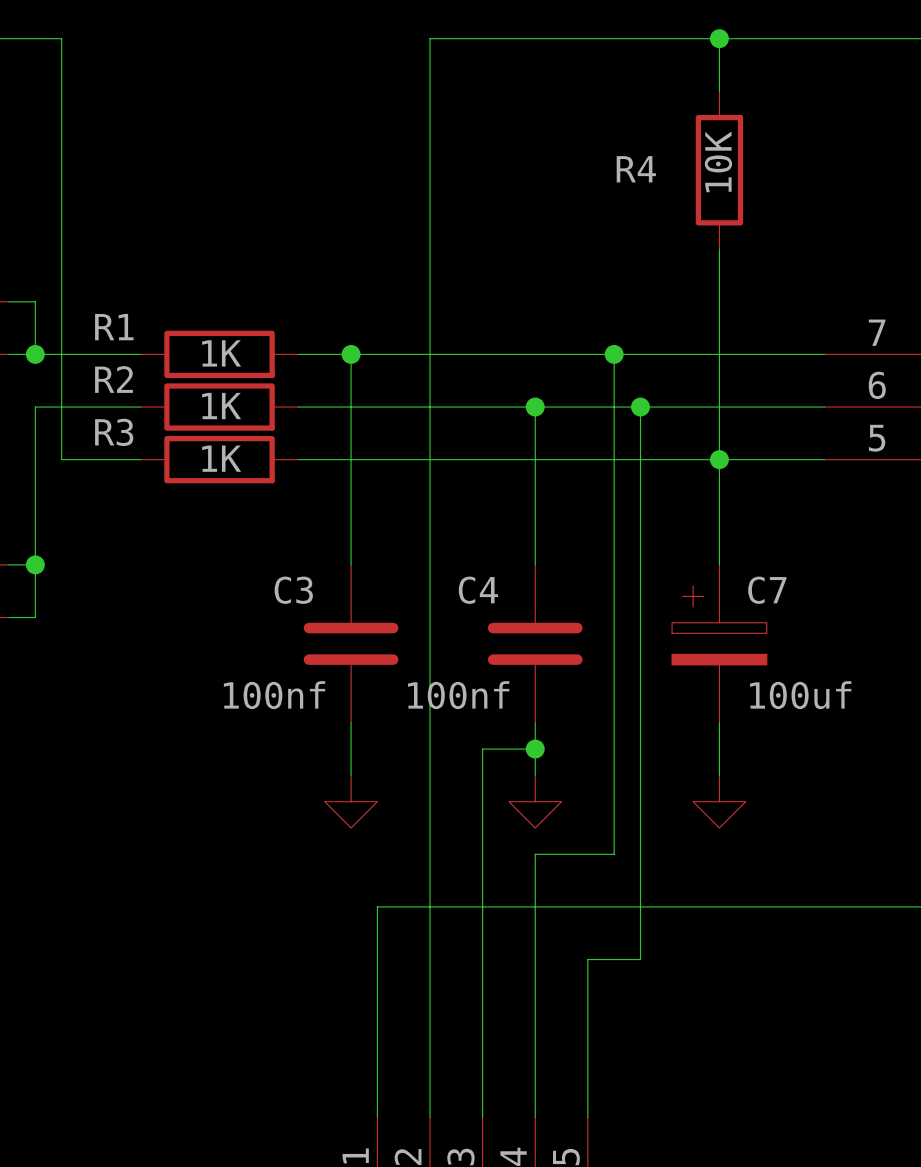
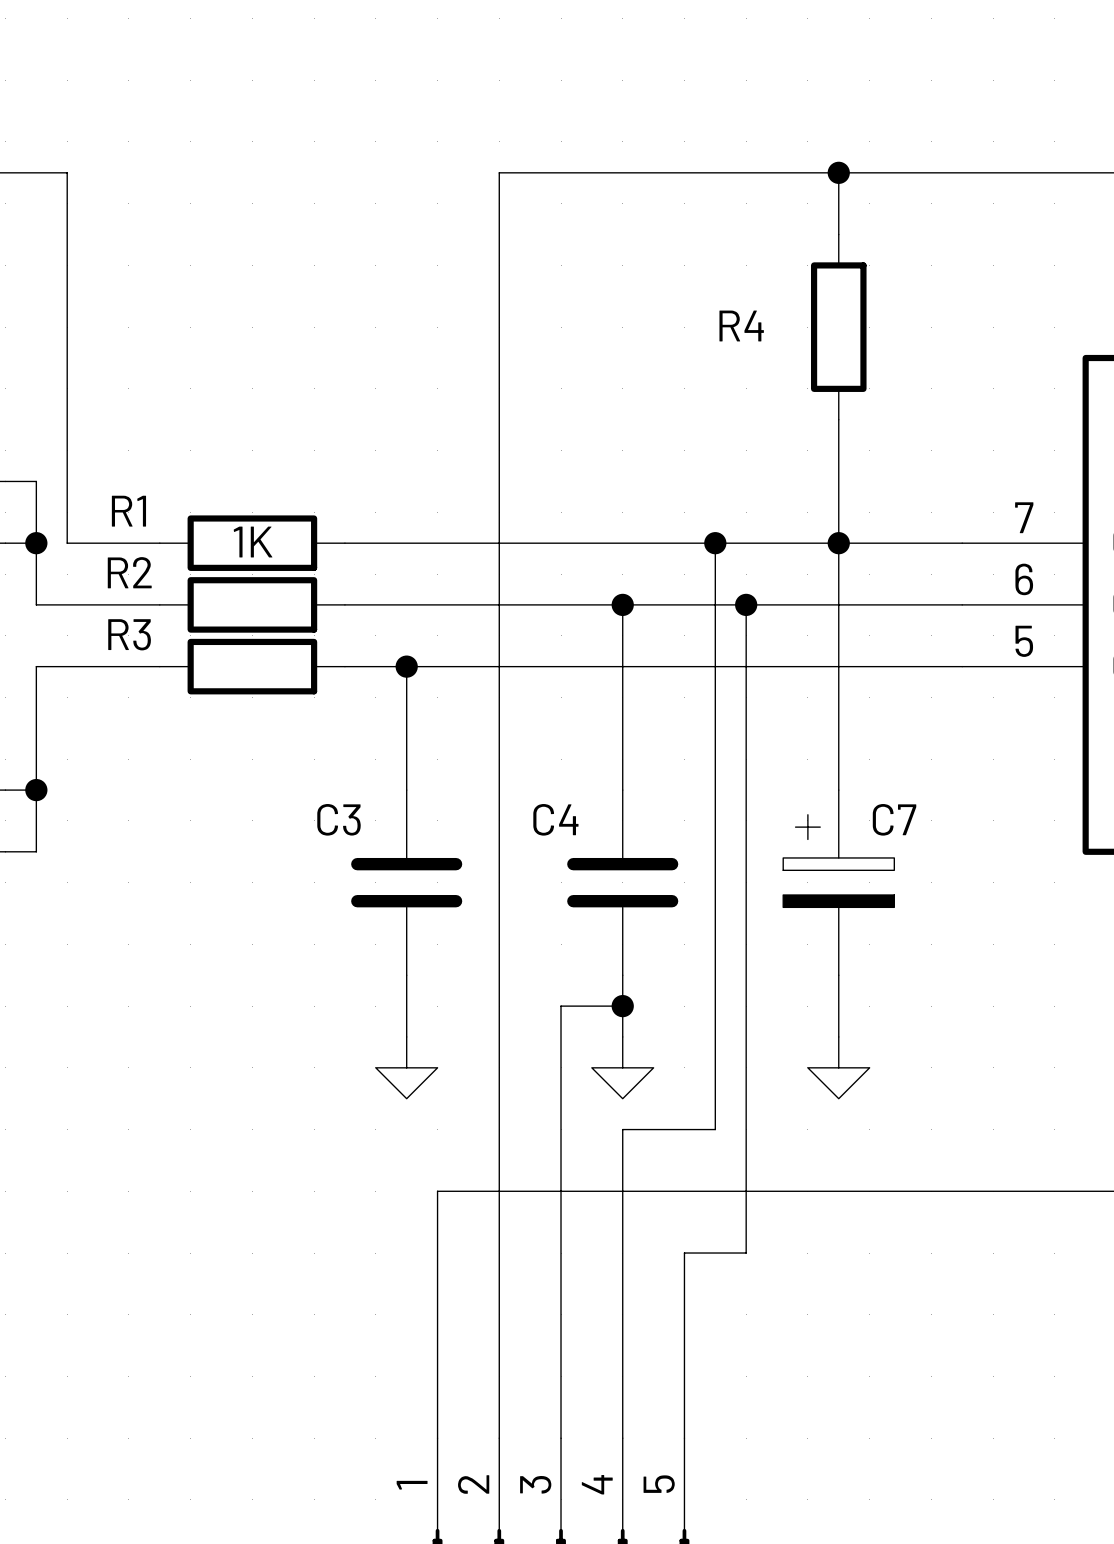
R4 value: 10K (718, 161) -> none
wire: (35, 354) (61, 354) (61, 459) -> (36, 543) (36, 604)
wire: (351, 354) (351, 459) -> none
junction position: (351, 354) -> (406, 666)
R2 value: 1K (221, 406) -> none
wire: (35, 407) (35, 459) -> (67, 666) (36, 666)
R3 value: 1K (221, 458) -> none
junction position: (719, 459) -> (838, 543)
C3 value: 100nf (274, 695) -> none
C4 value: 100nf (458, 695) -> none
C7 value: 100uf (800, 695) -> none

